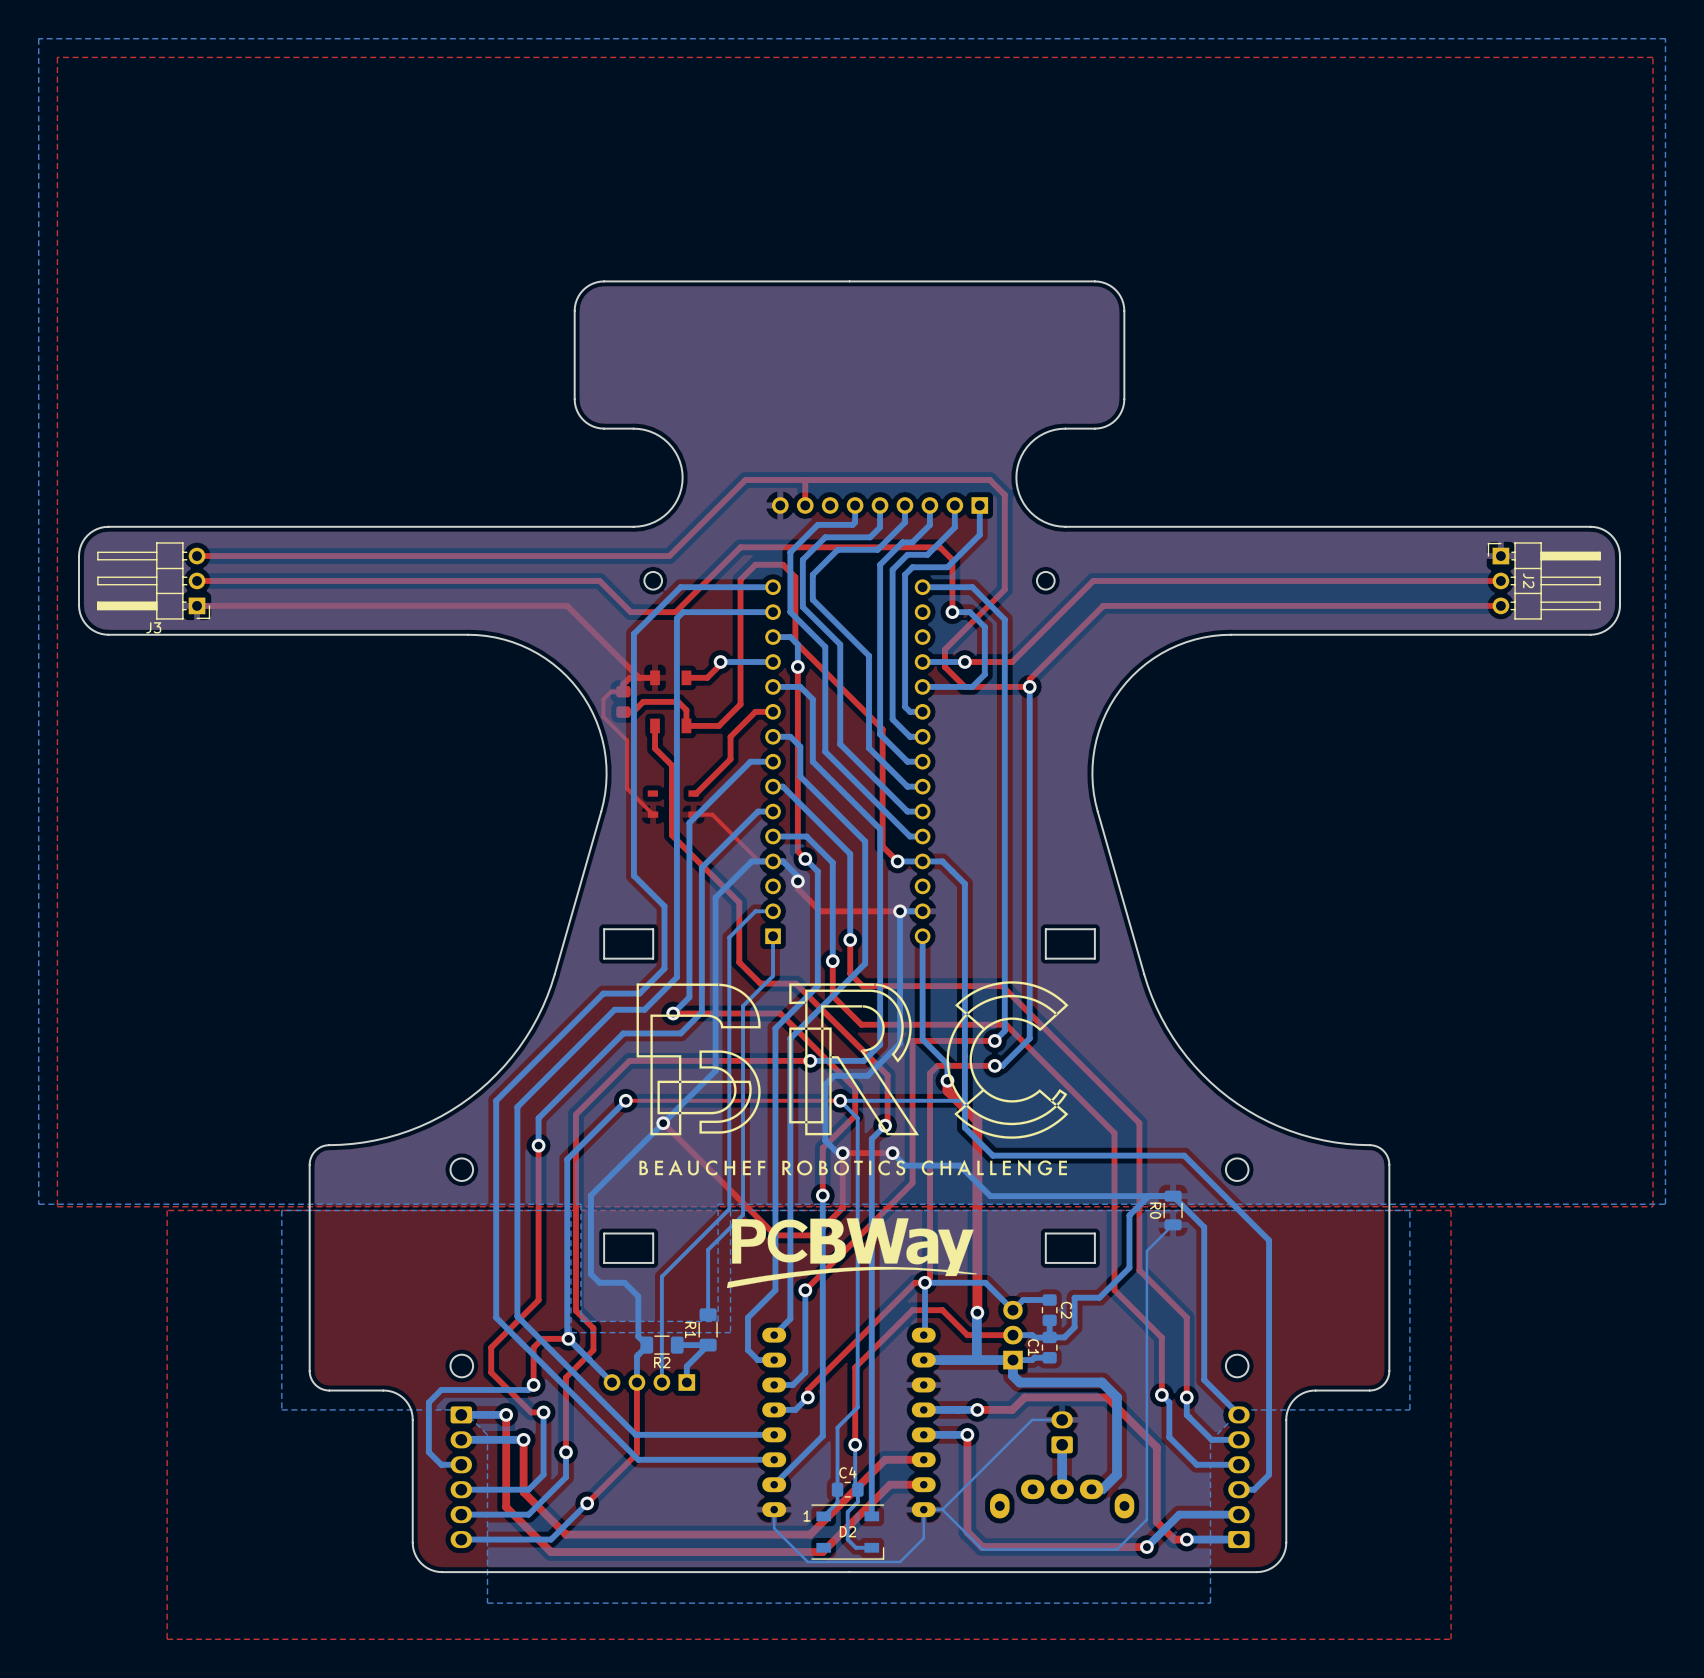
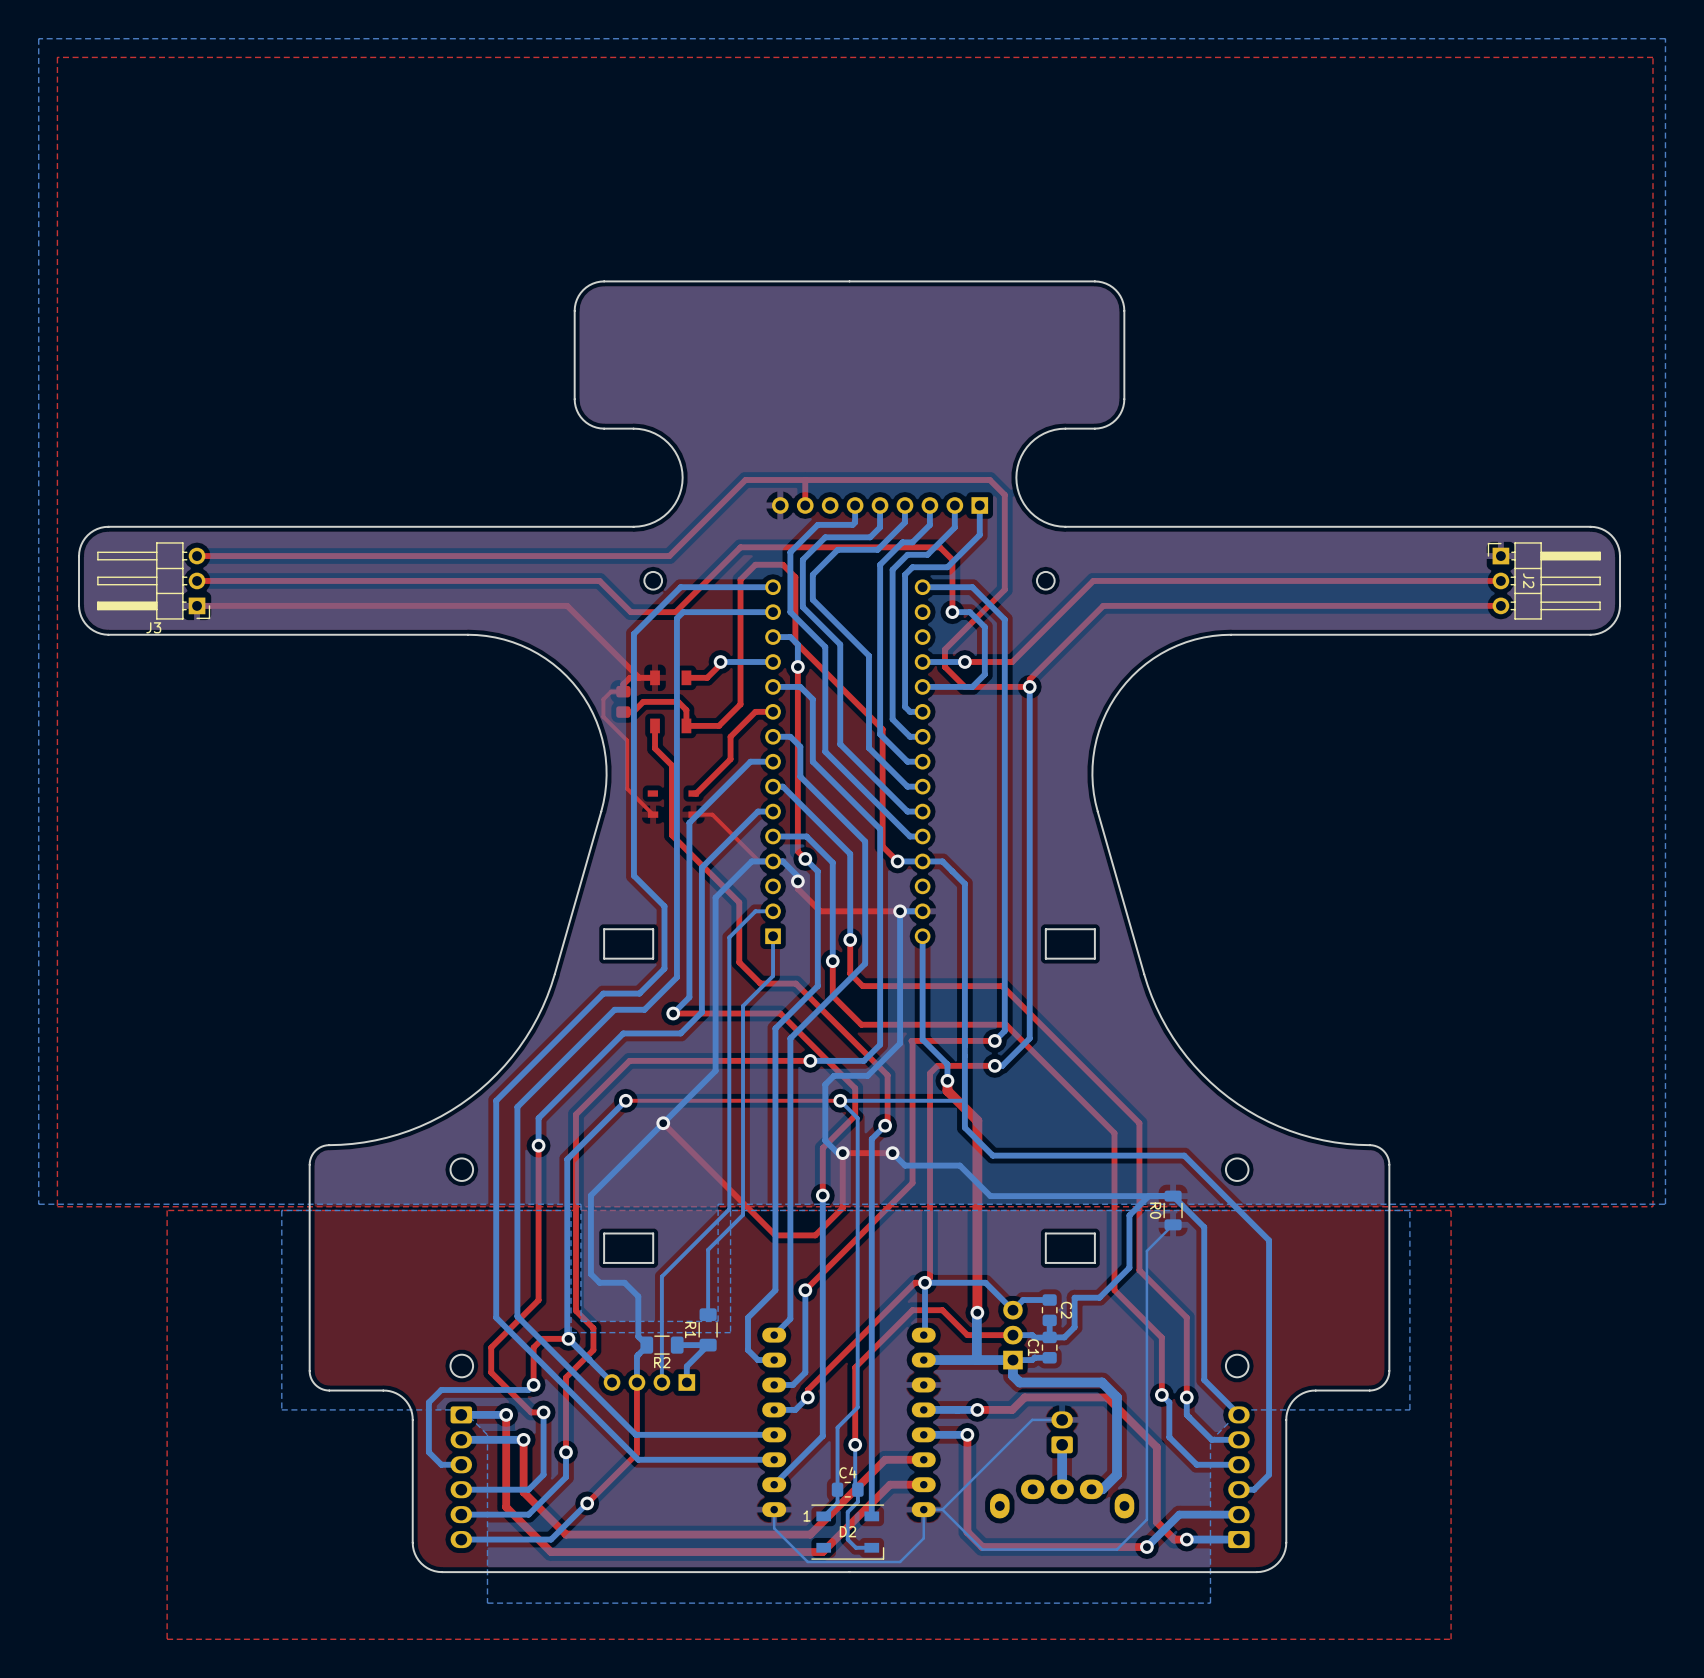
drawing: [946, 981, 1069, 1139] -> none
drawing: [636, 983, 761, 1136] -> none
drawing: [789, 983, 920, 1136] -> none
drawing: [639, 1159, 766, 1176] -> none
drawing: [921, 1159, 1068, 1177] -> none
drawing: [782, 1160, 906, 1176] -> none
drawing: [726, 1218, 977, 1289] -> none

